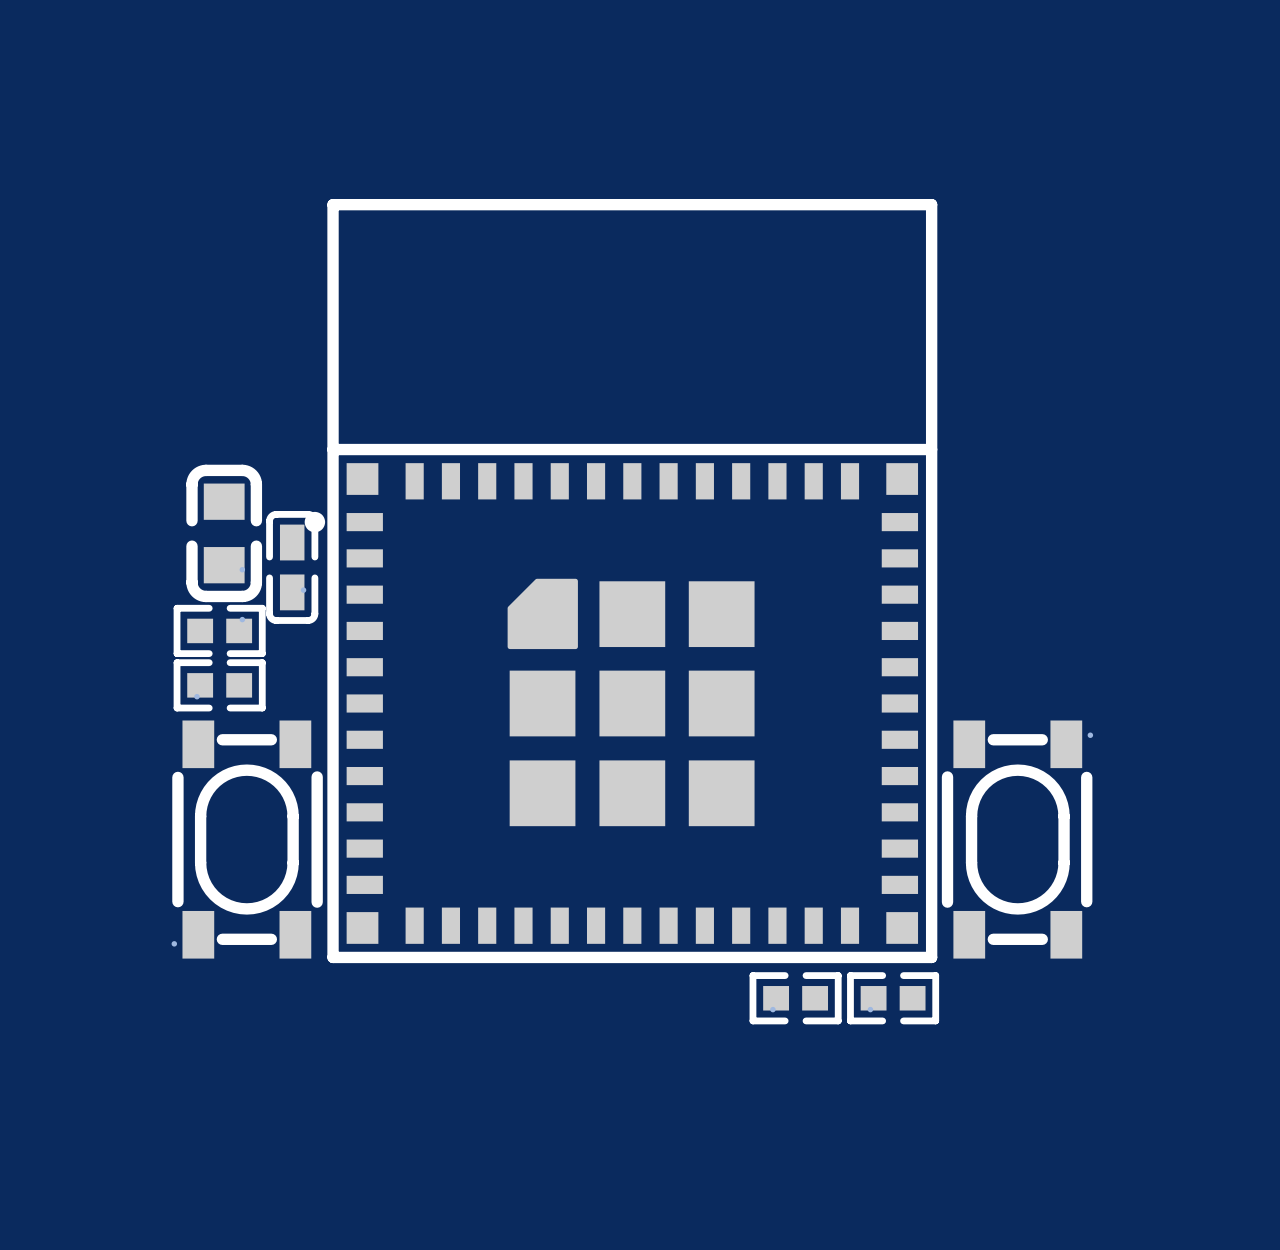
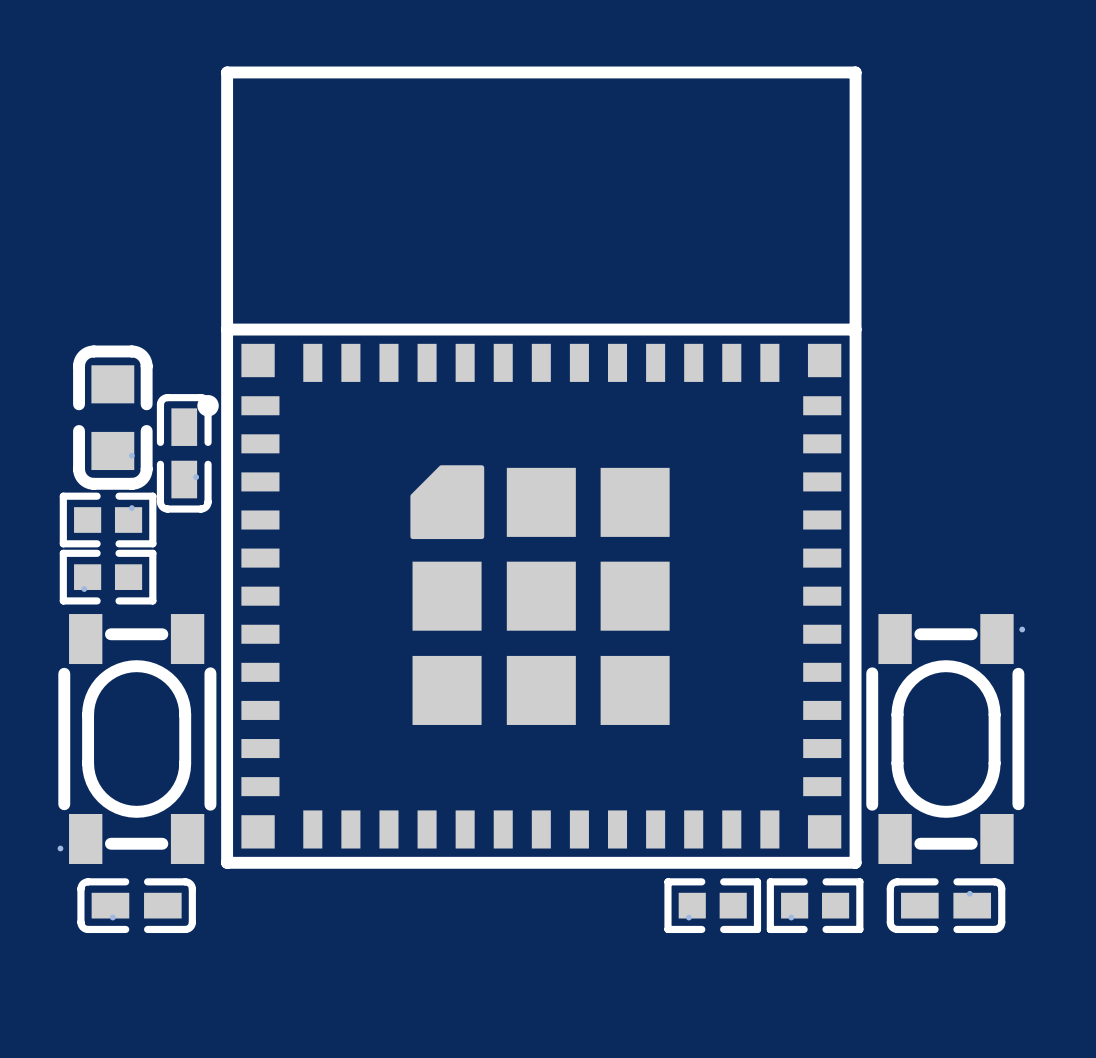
part: none -> (136, 905)
part: none -> (946, 905)

